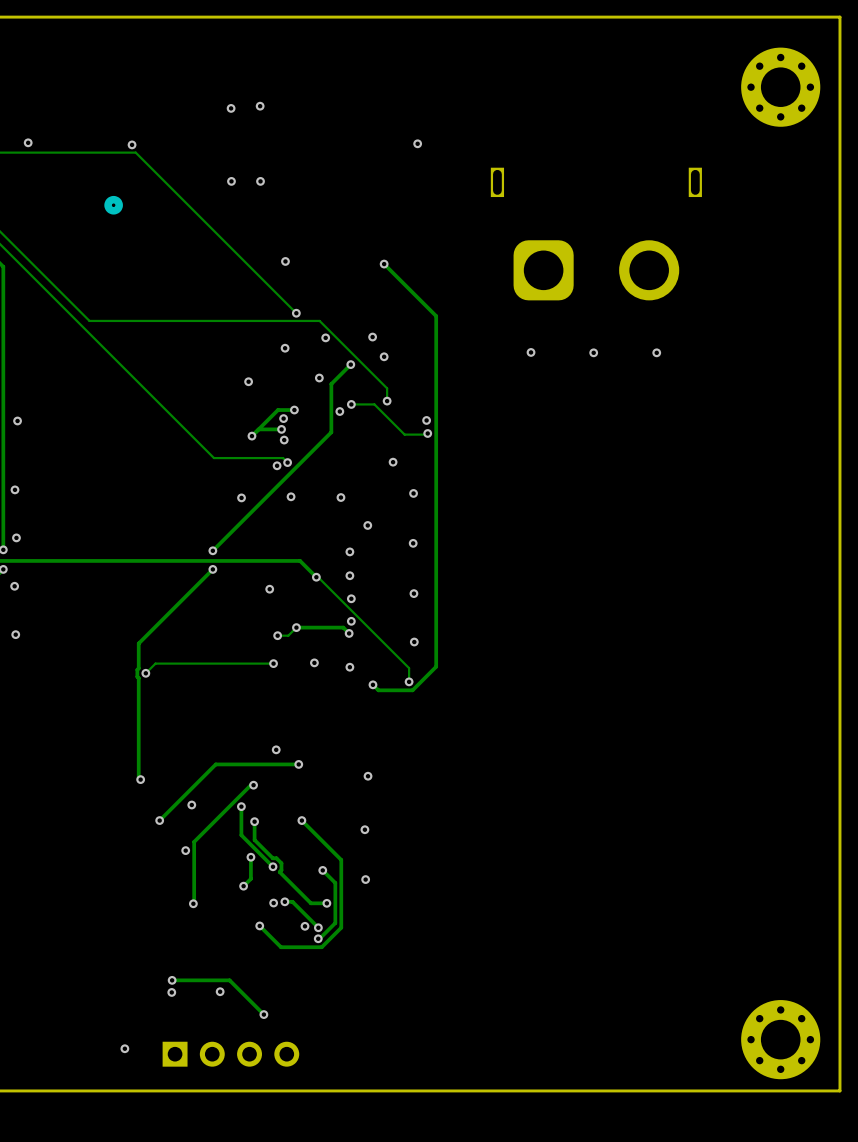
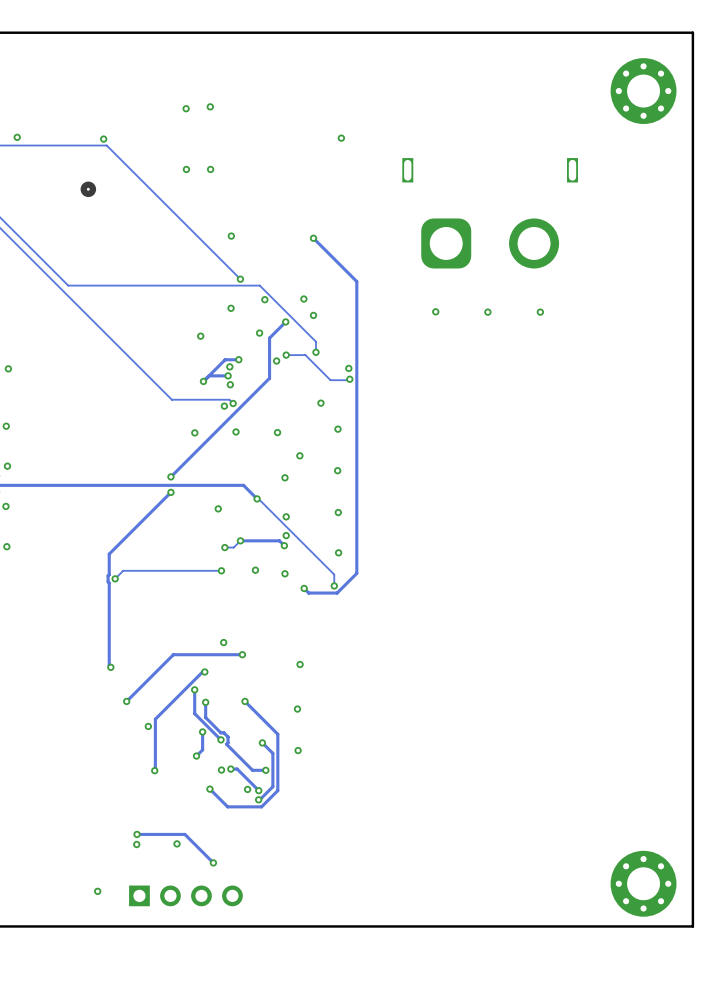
via: (349, 575) -> none
via: (191, 805) -> none

